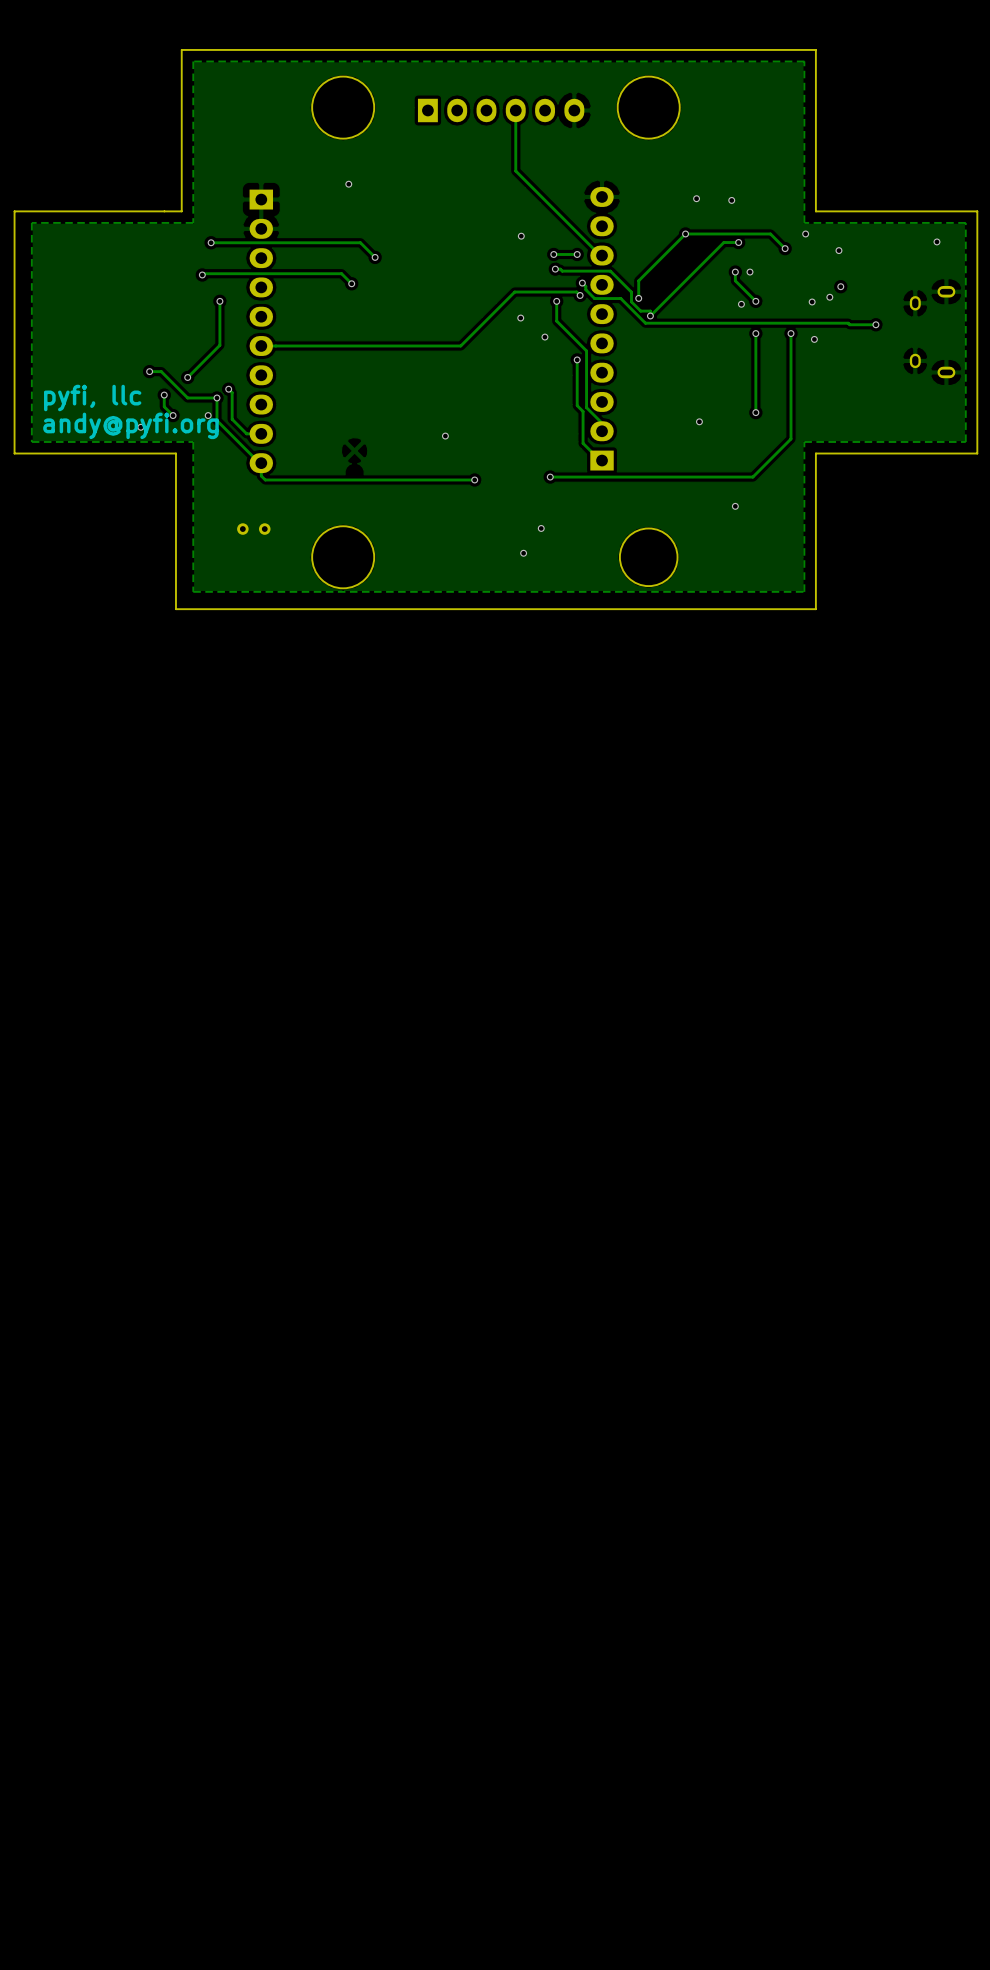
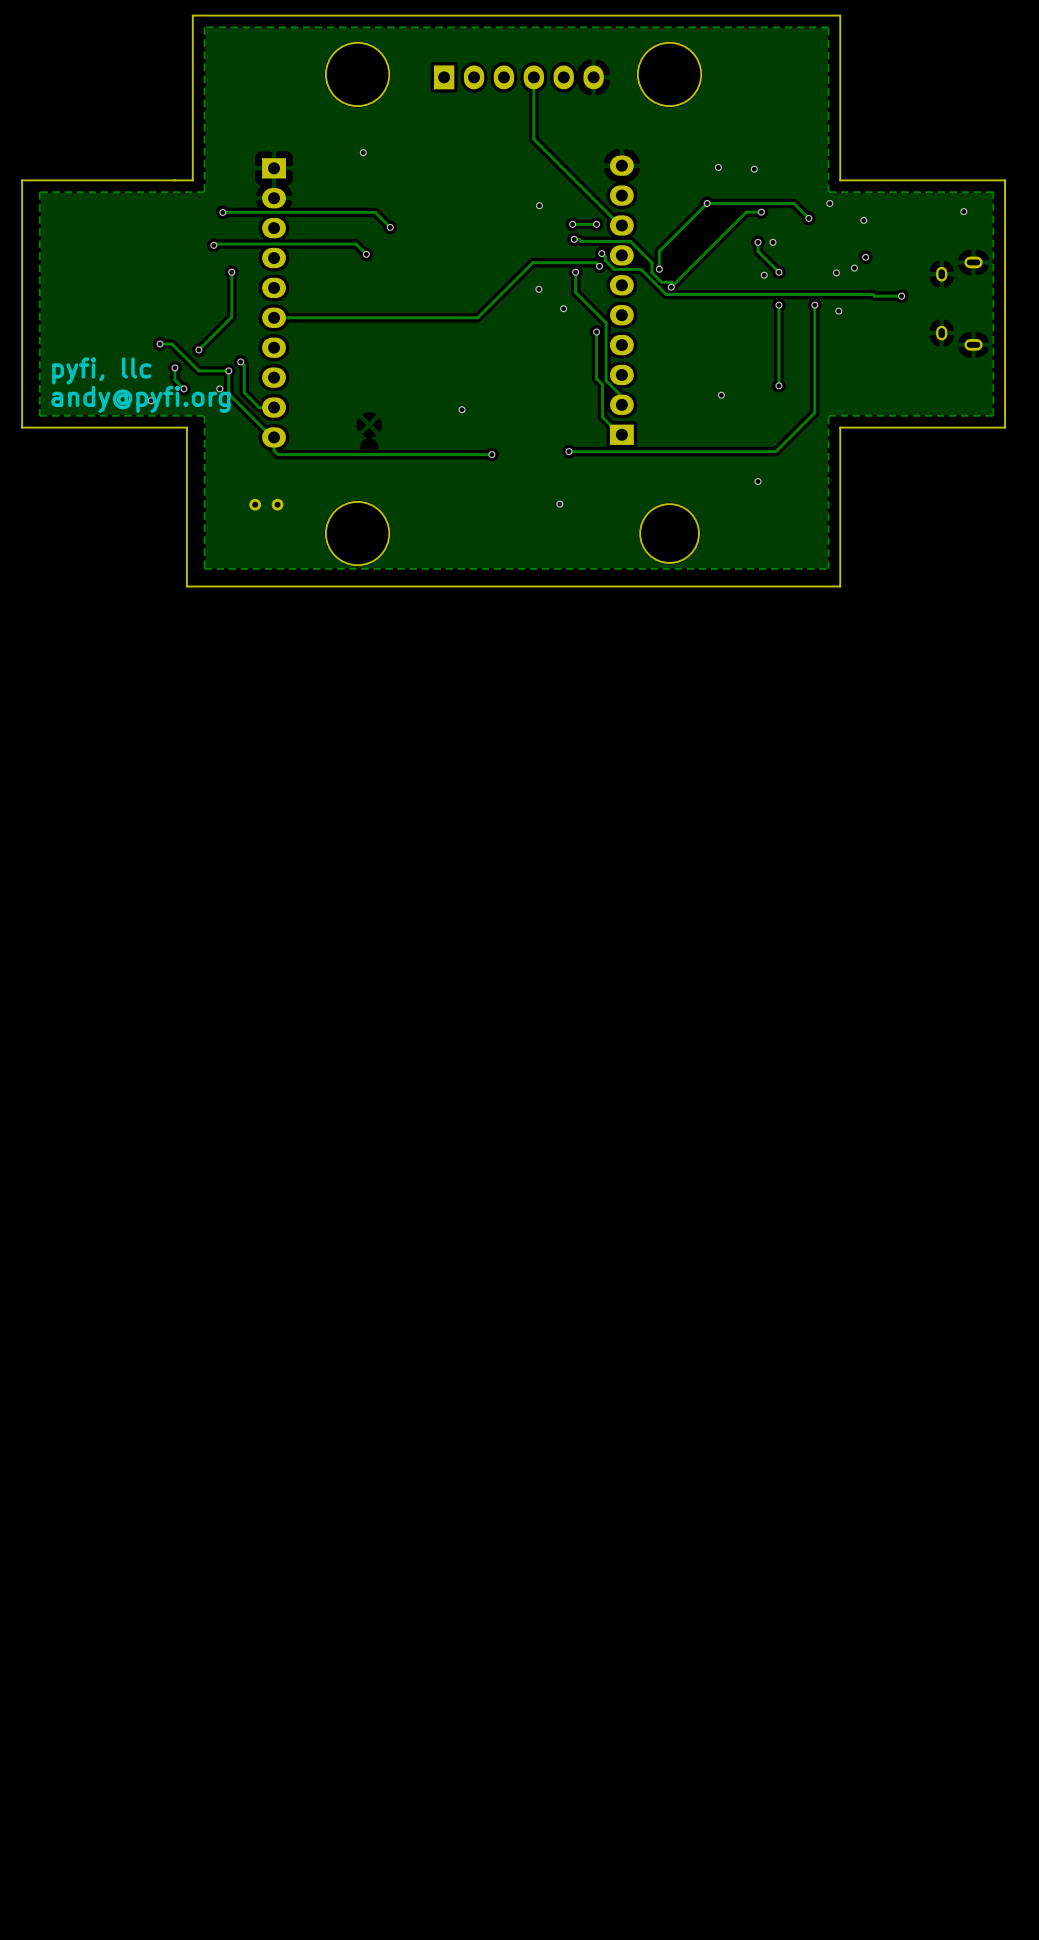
via: (523, 553) -> none

